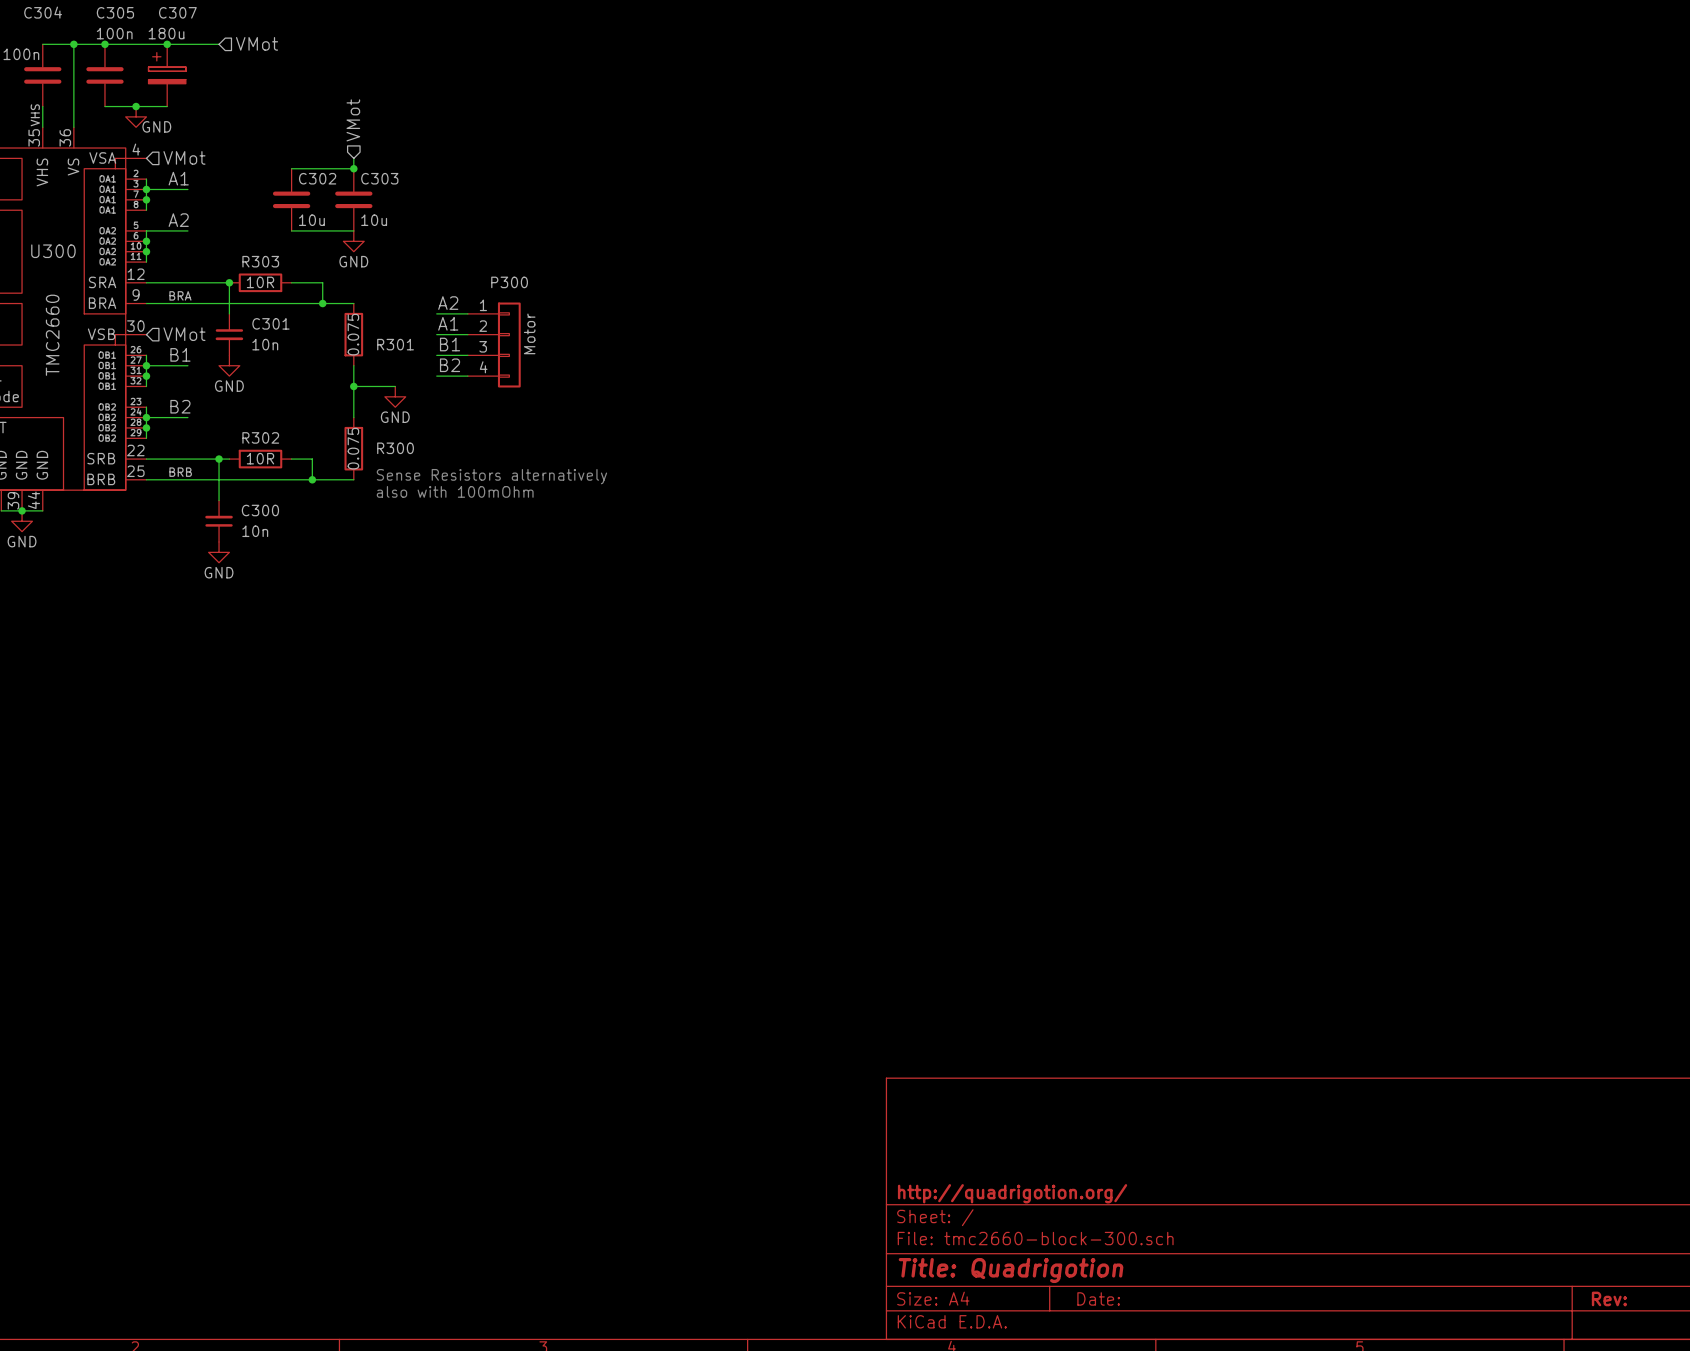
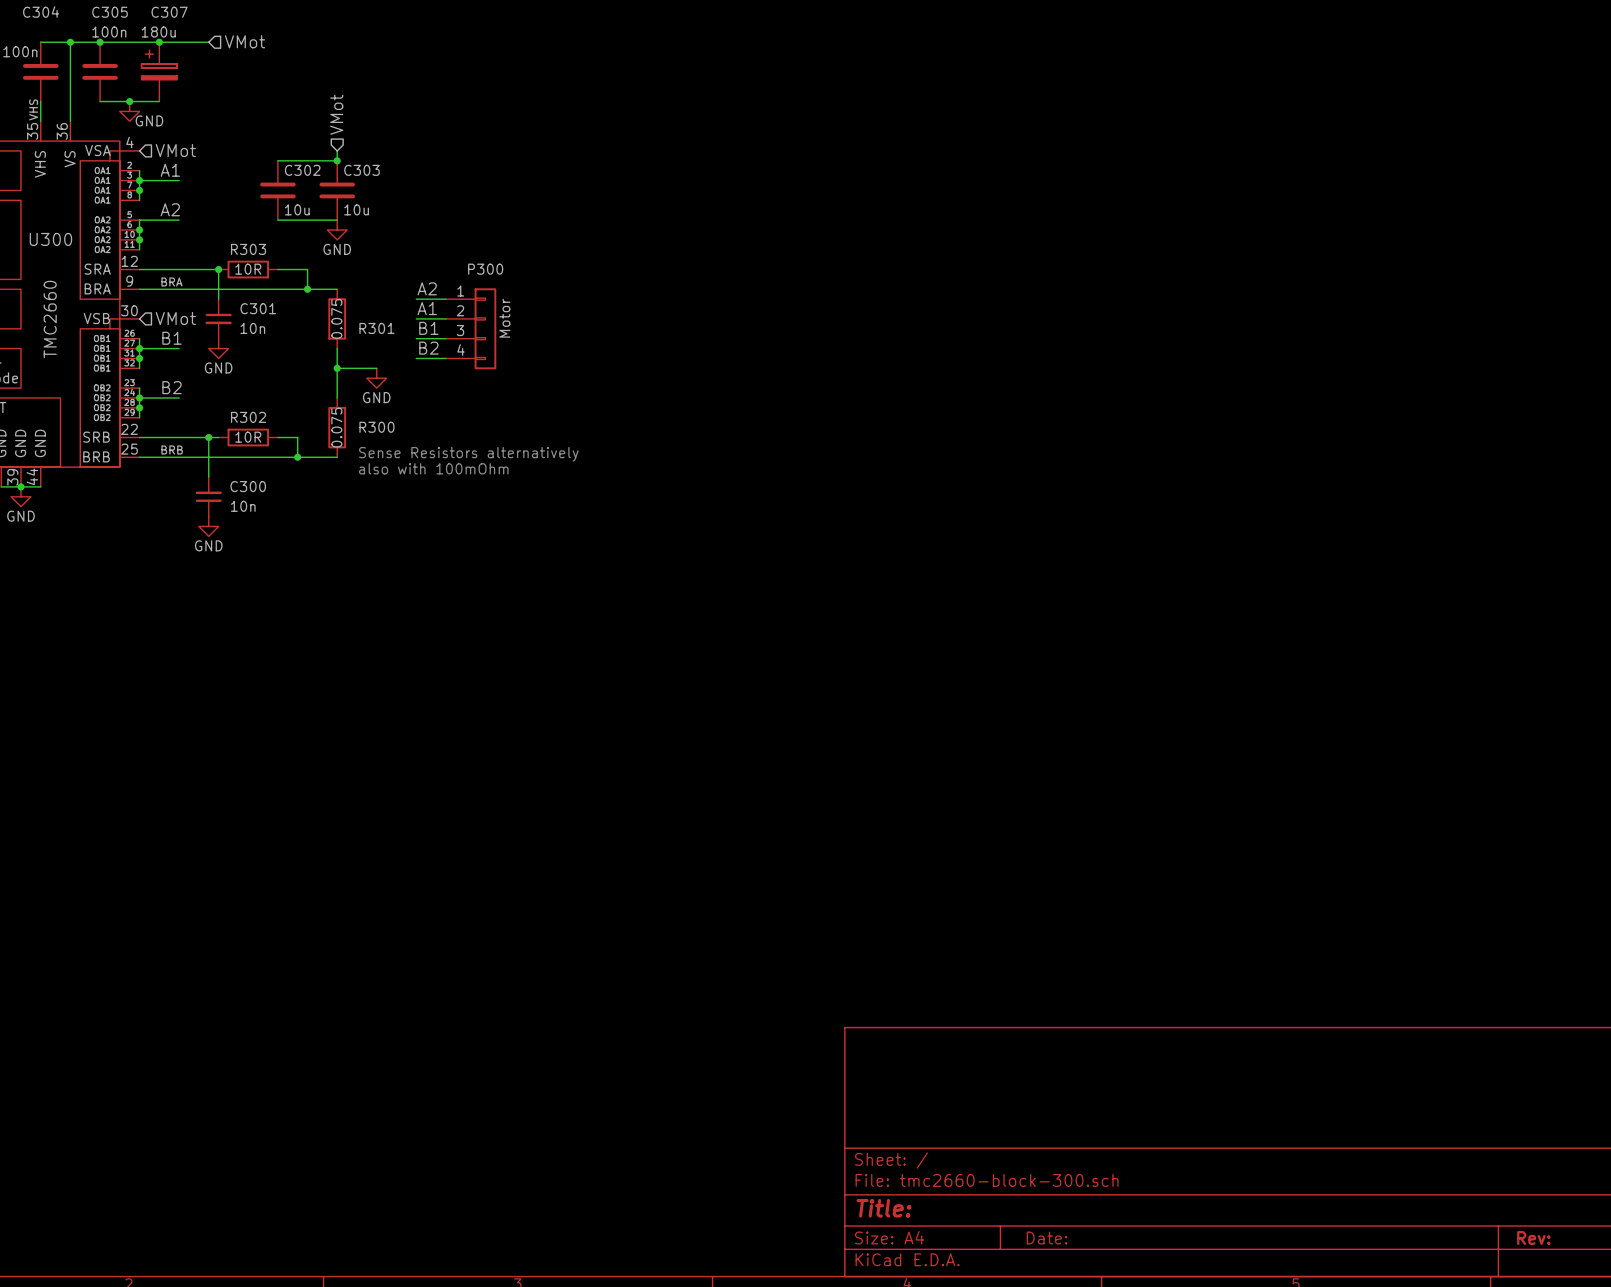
title block: http://quadrigotion.org/ (1012, 1193) -> none
title block: Title: Quadrigotion (1011, 1270) -> Title: (883, 1208)

